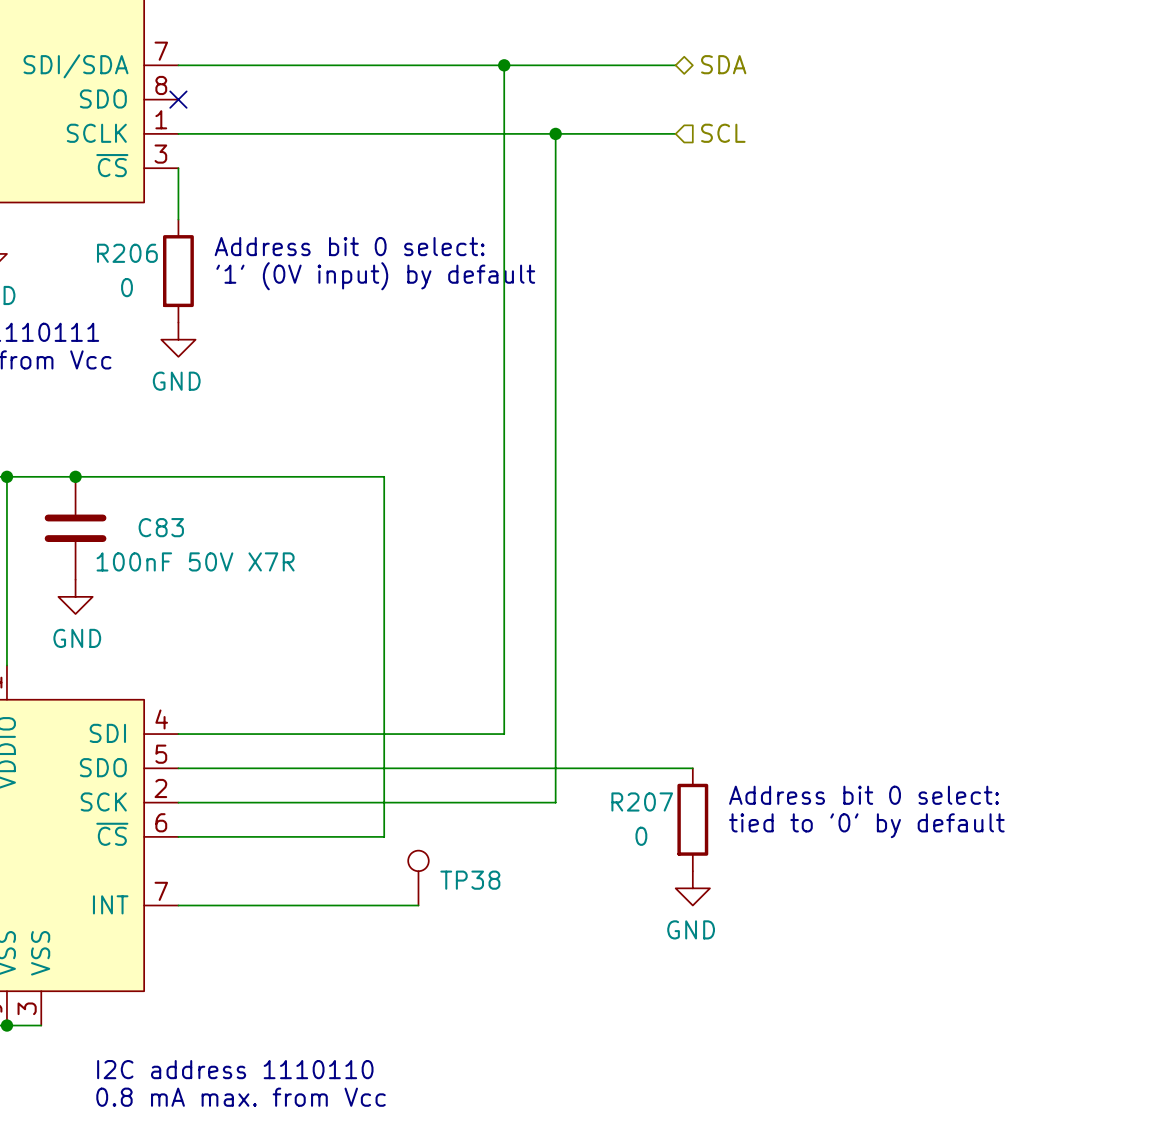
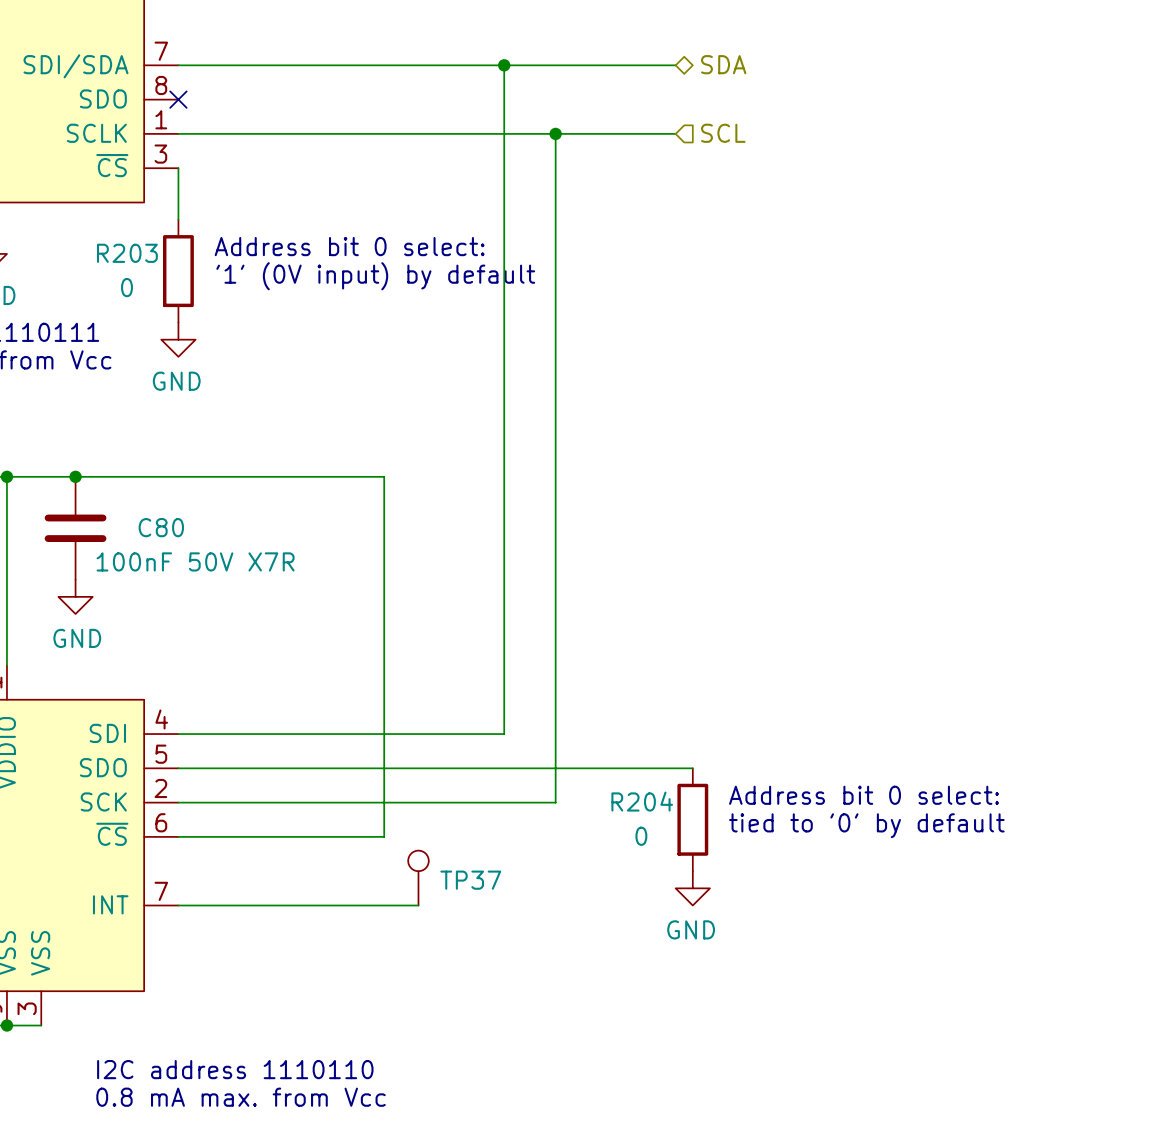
R206 name: R206 (127, 253) -> R203 (127, 253)
C83 name: C83 (161, 527) -> C80 (161, 527)
R207 name: R207 (642, 801) -> R204 (642, 801)
TP38 name: TP38 (470, 880) -> TP37 (470, 880)

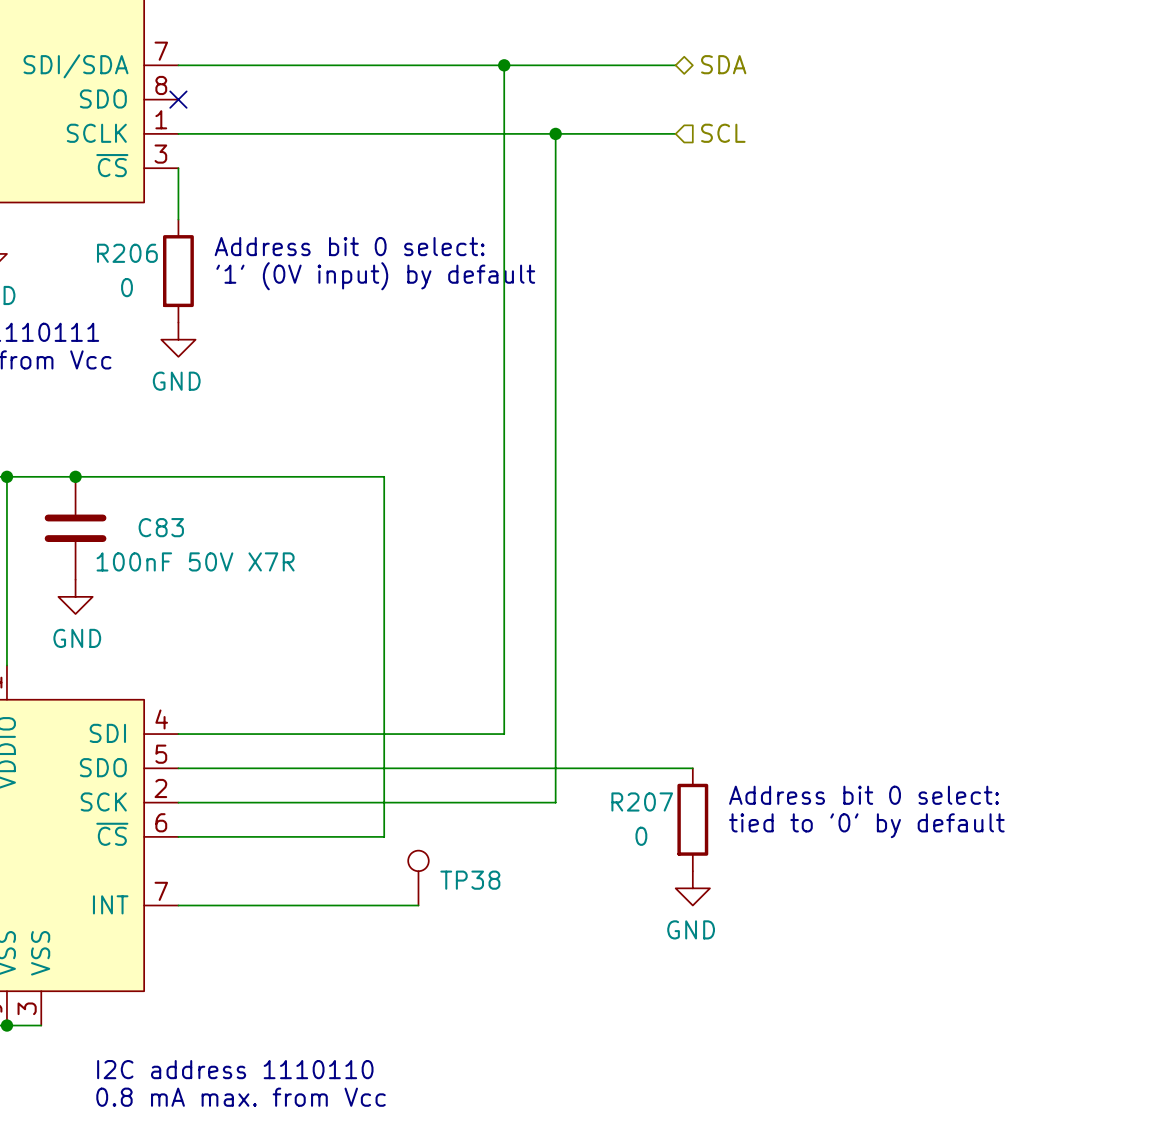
R203 name: R203 (127, 253) -> R206 (127, 253)
C80 name: C80 (161, 527) -> C83 (161, 527)
R204 name: R204 (642, 801) -> R207 (642, 801)
TP37 name: TP37 (470, 880) -> TP38 (470, 880)

